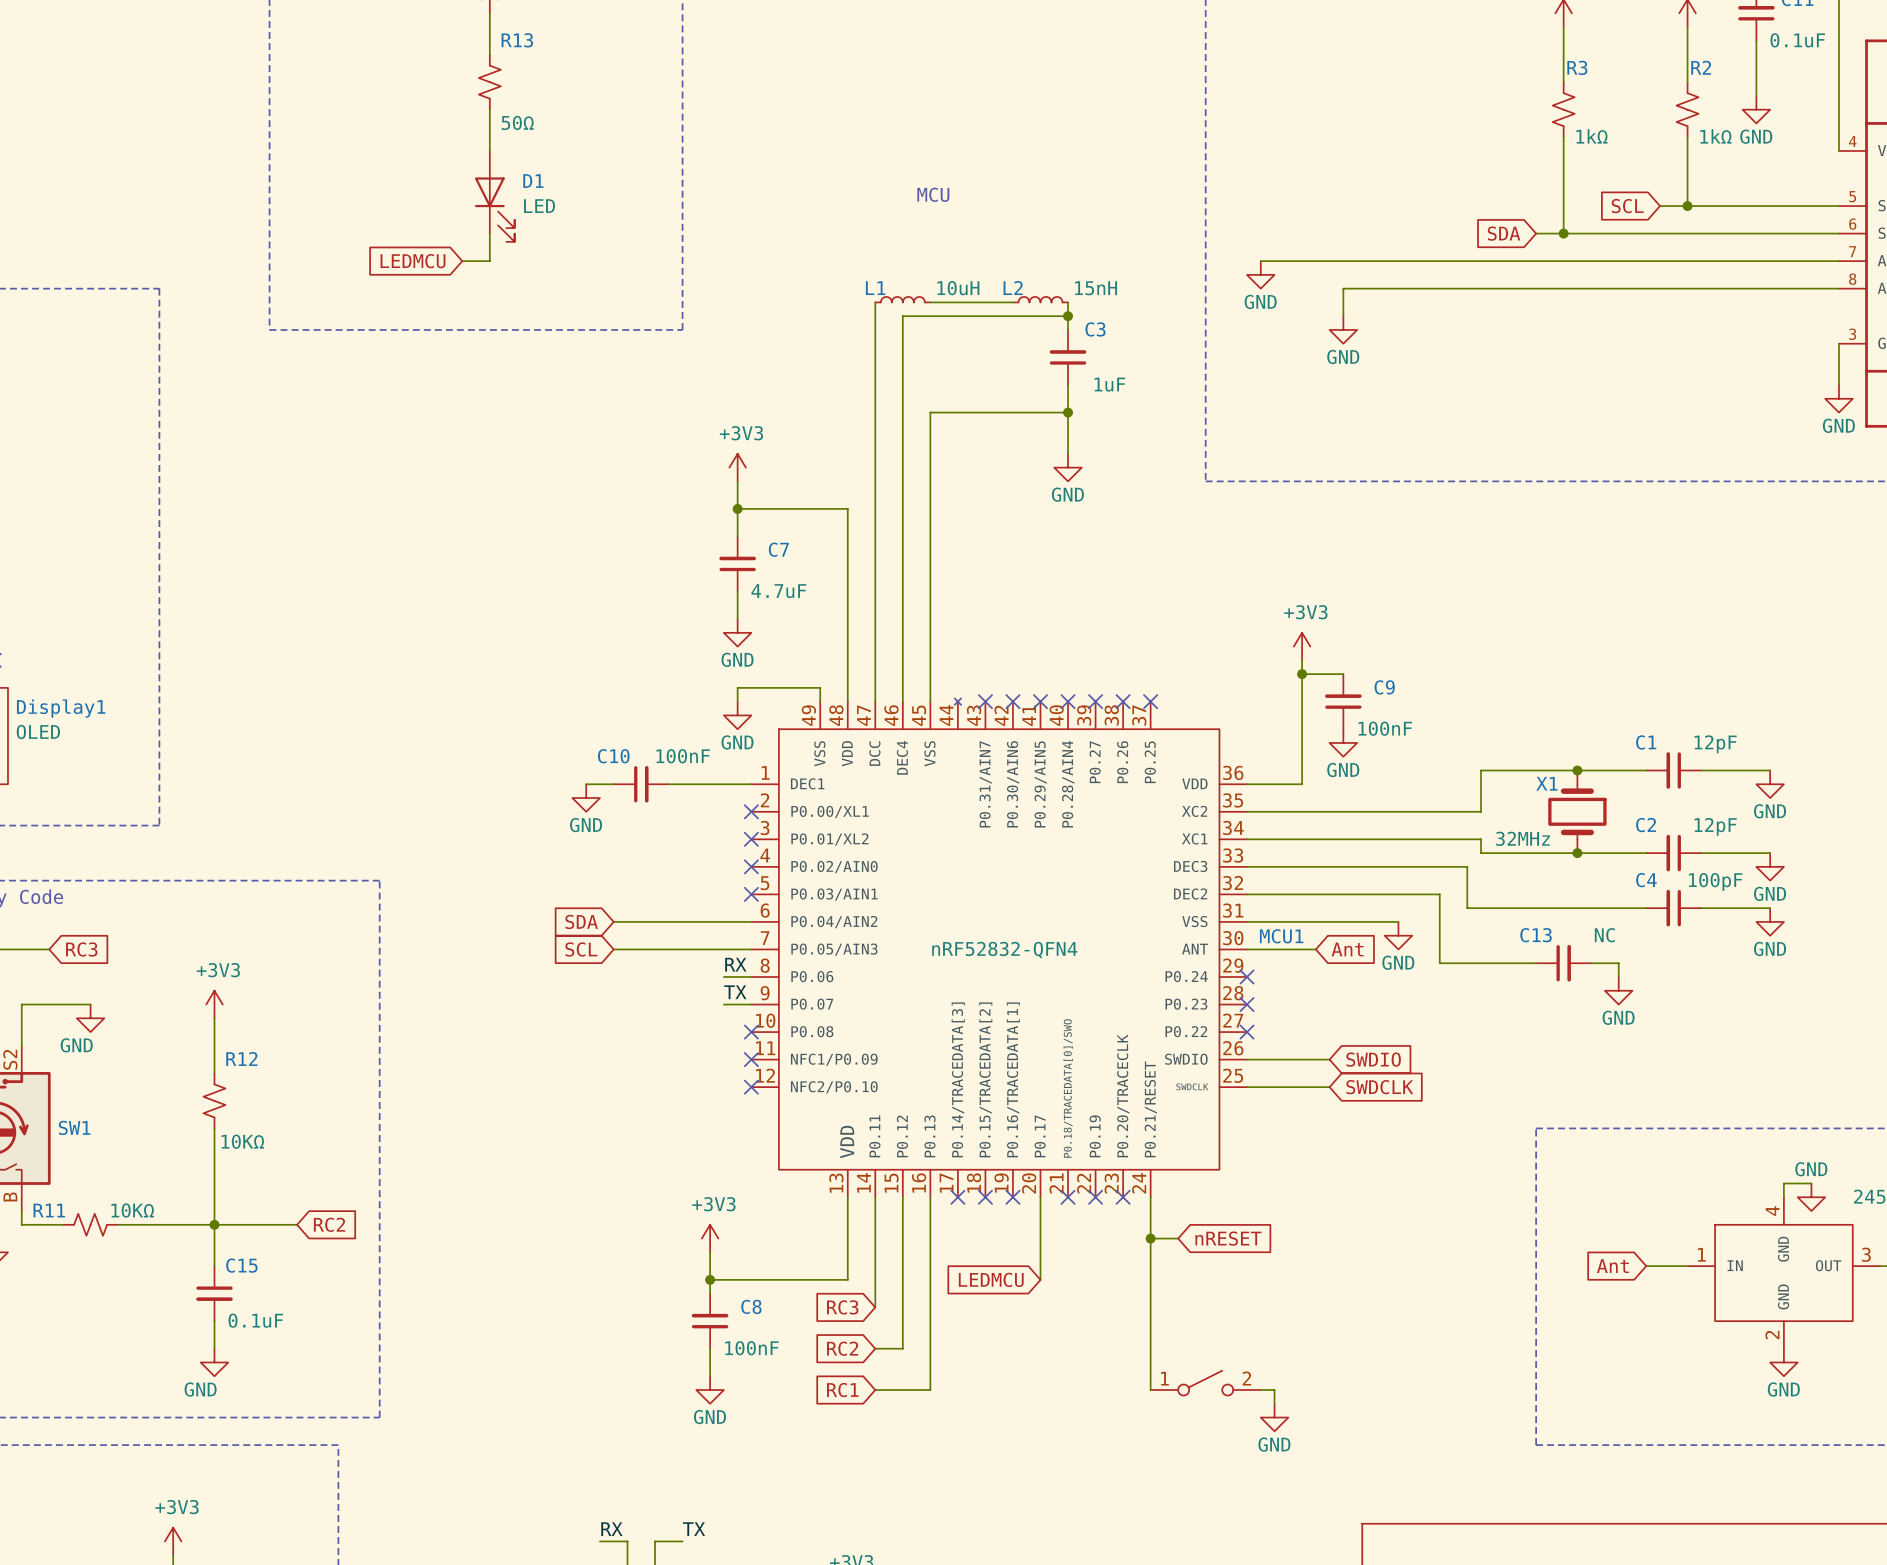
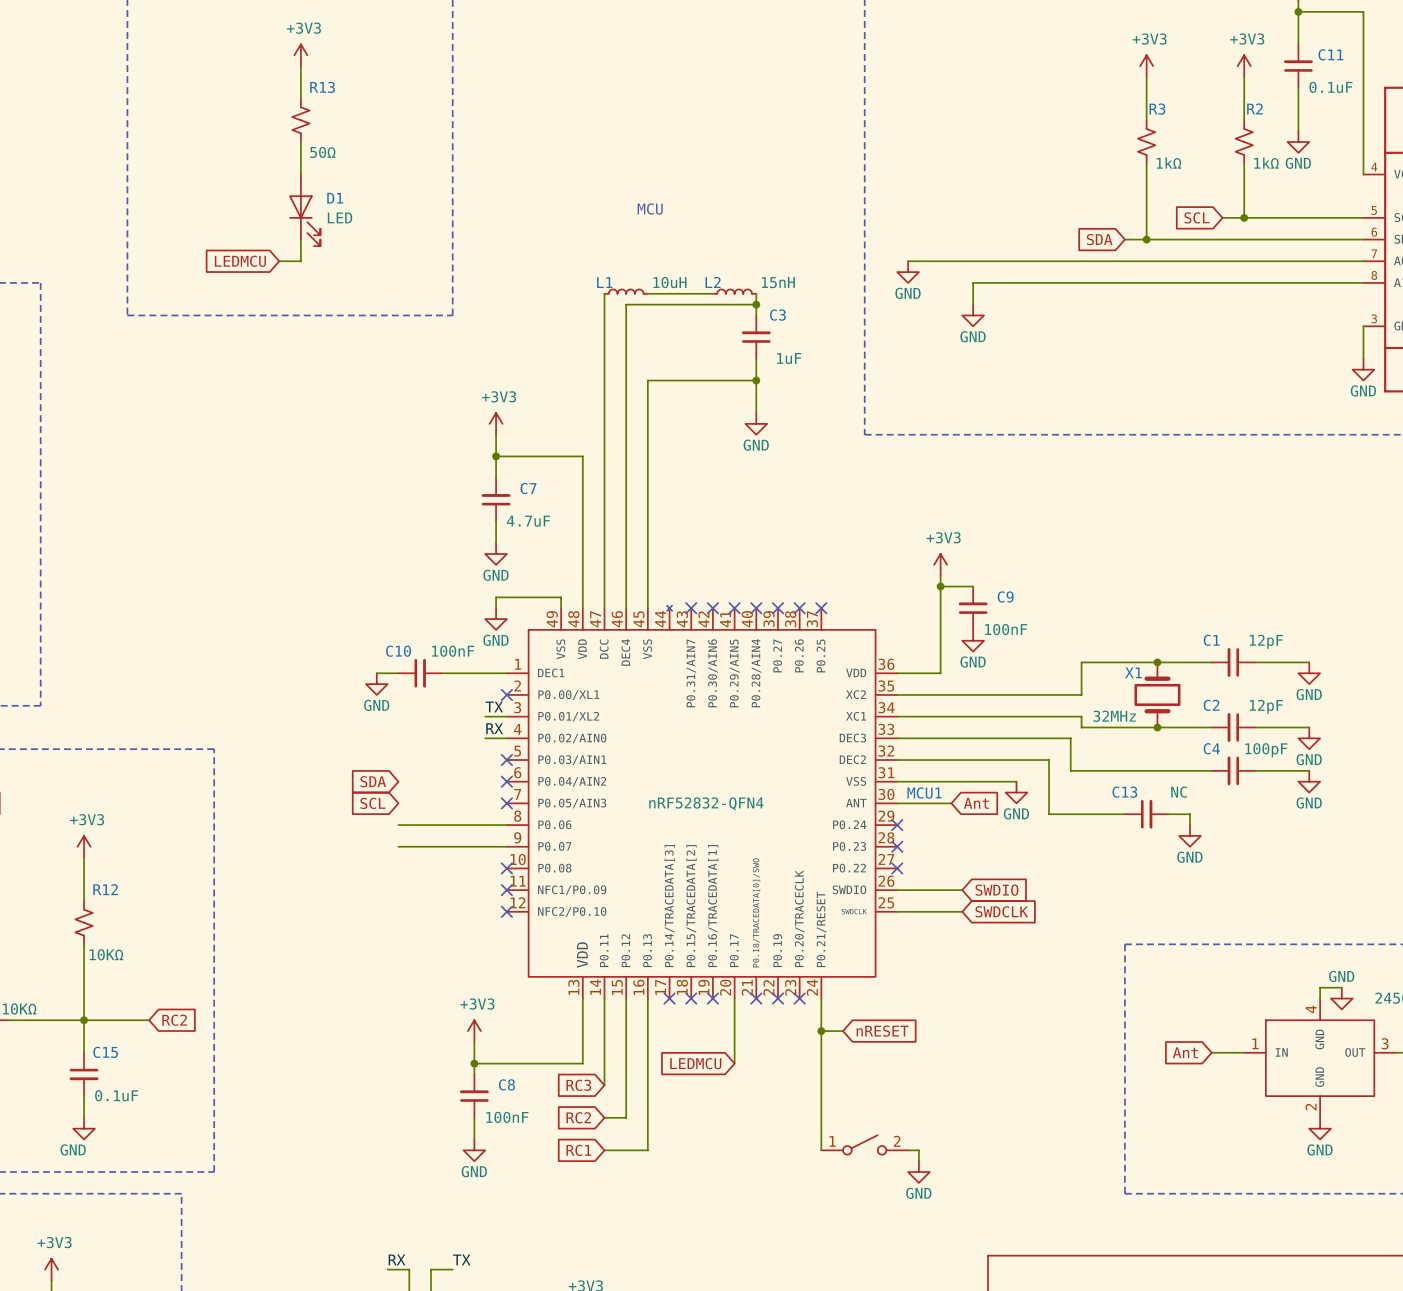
wire: none -> (485, 716) (506, 716)
no-connect mark: (751, 839) -> none
wire: none -> (485, 738) (506, 738)
no-connect mark: (751, 866) -> none
wire: (613, 921) (751, 921) -> none
no-connect mark: none -> (506, 781)
wire: (613, 949) (751, 949) -> none
no-connect mark: none -> (506, 803)
label position: RX (735, 964) -> RX (494, 728)
wire: none -> (398, 825) (485, 825)
label position: TX (735, 992) -> TX (494, 706)
wire: none -> (398, 846) (485, 846)

